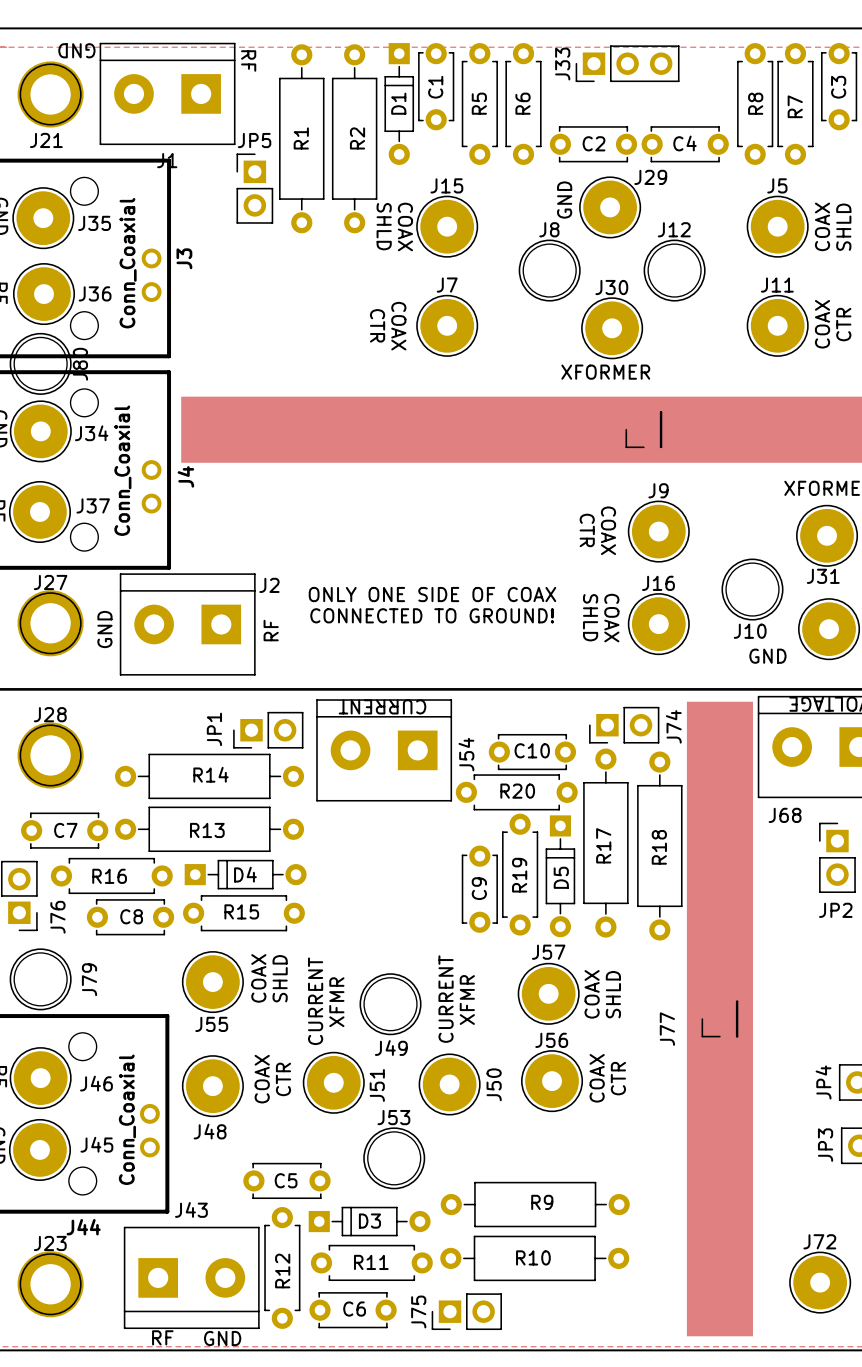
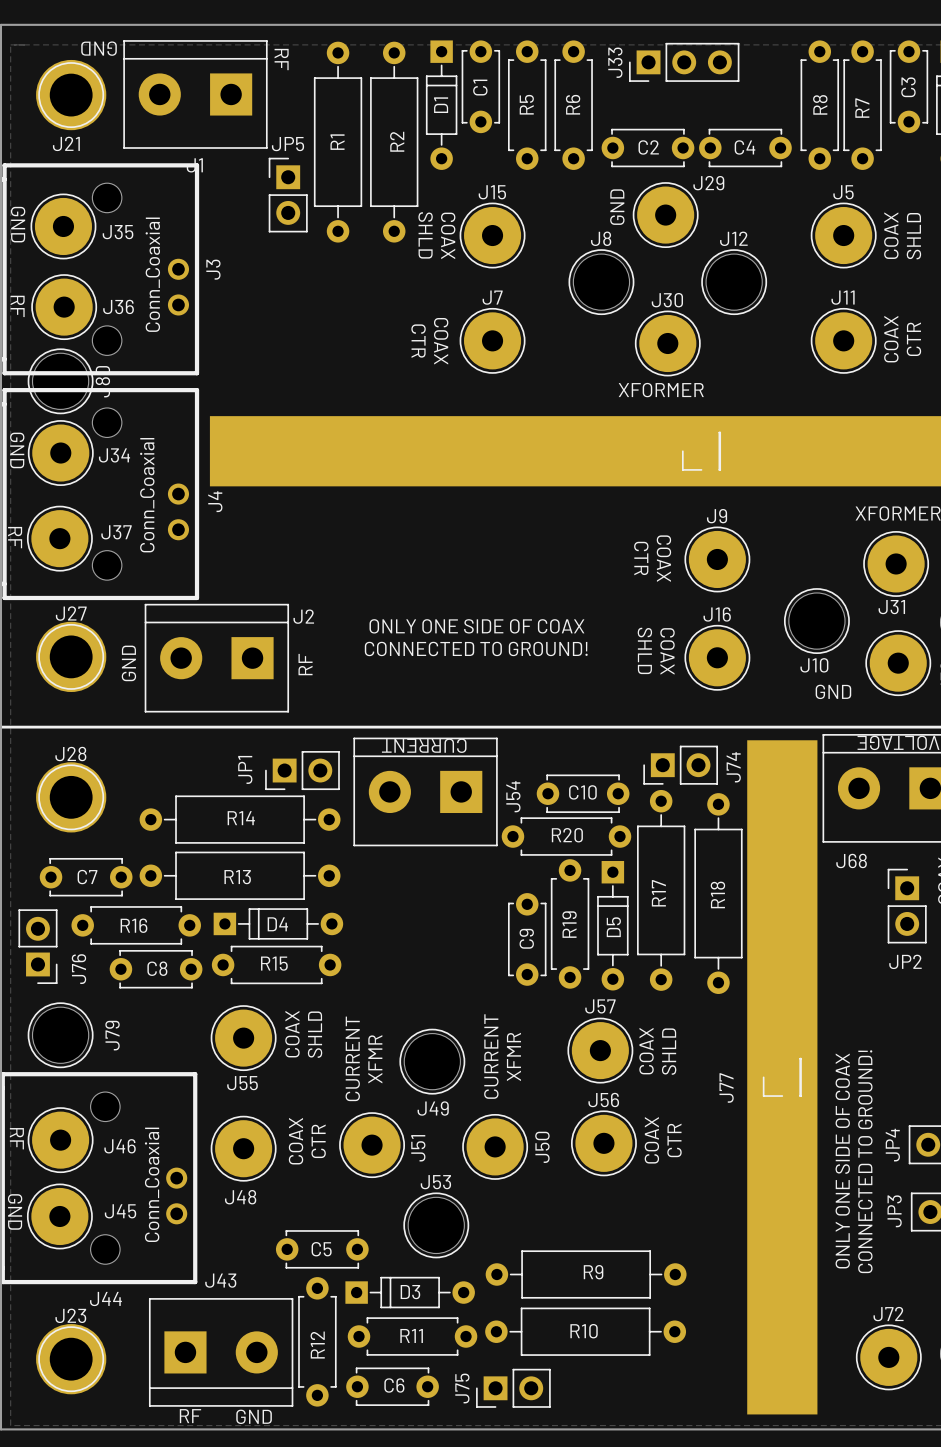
text: none -> ONLY ONE SIDE OF COAX (842, 1161)
text: none -> CONNECTED TO GROUND! (865, 1161)

